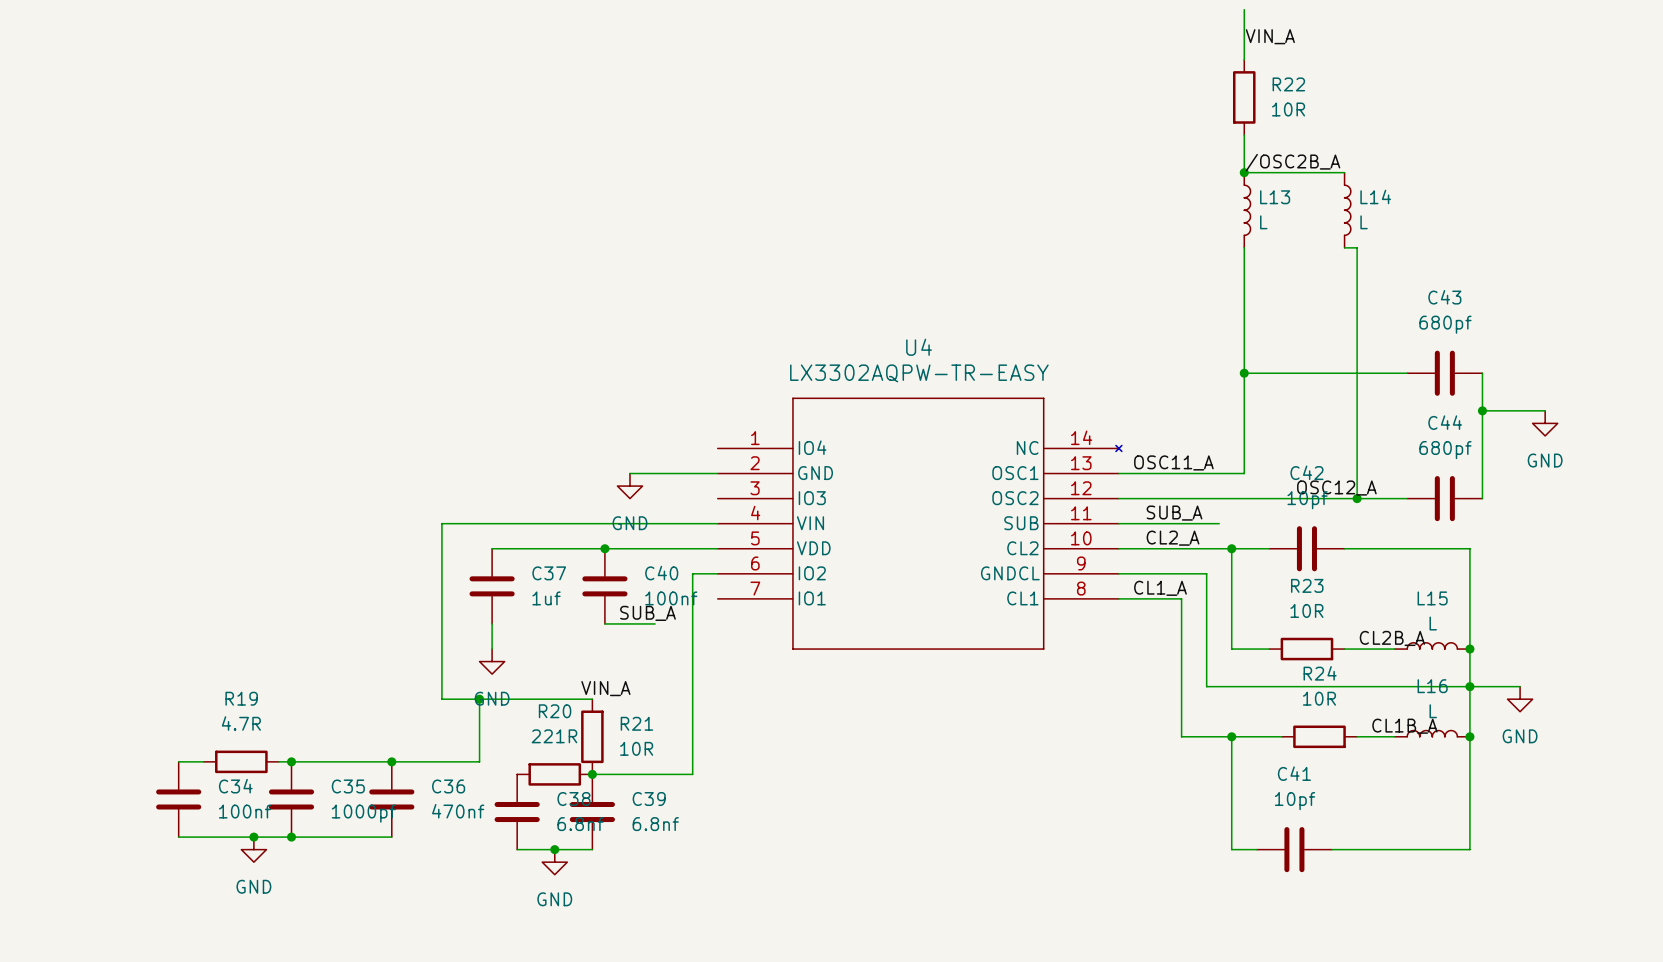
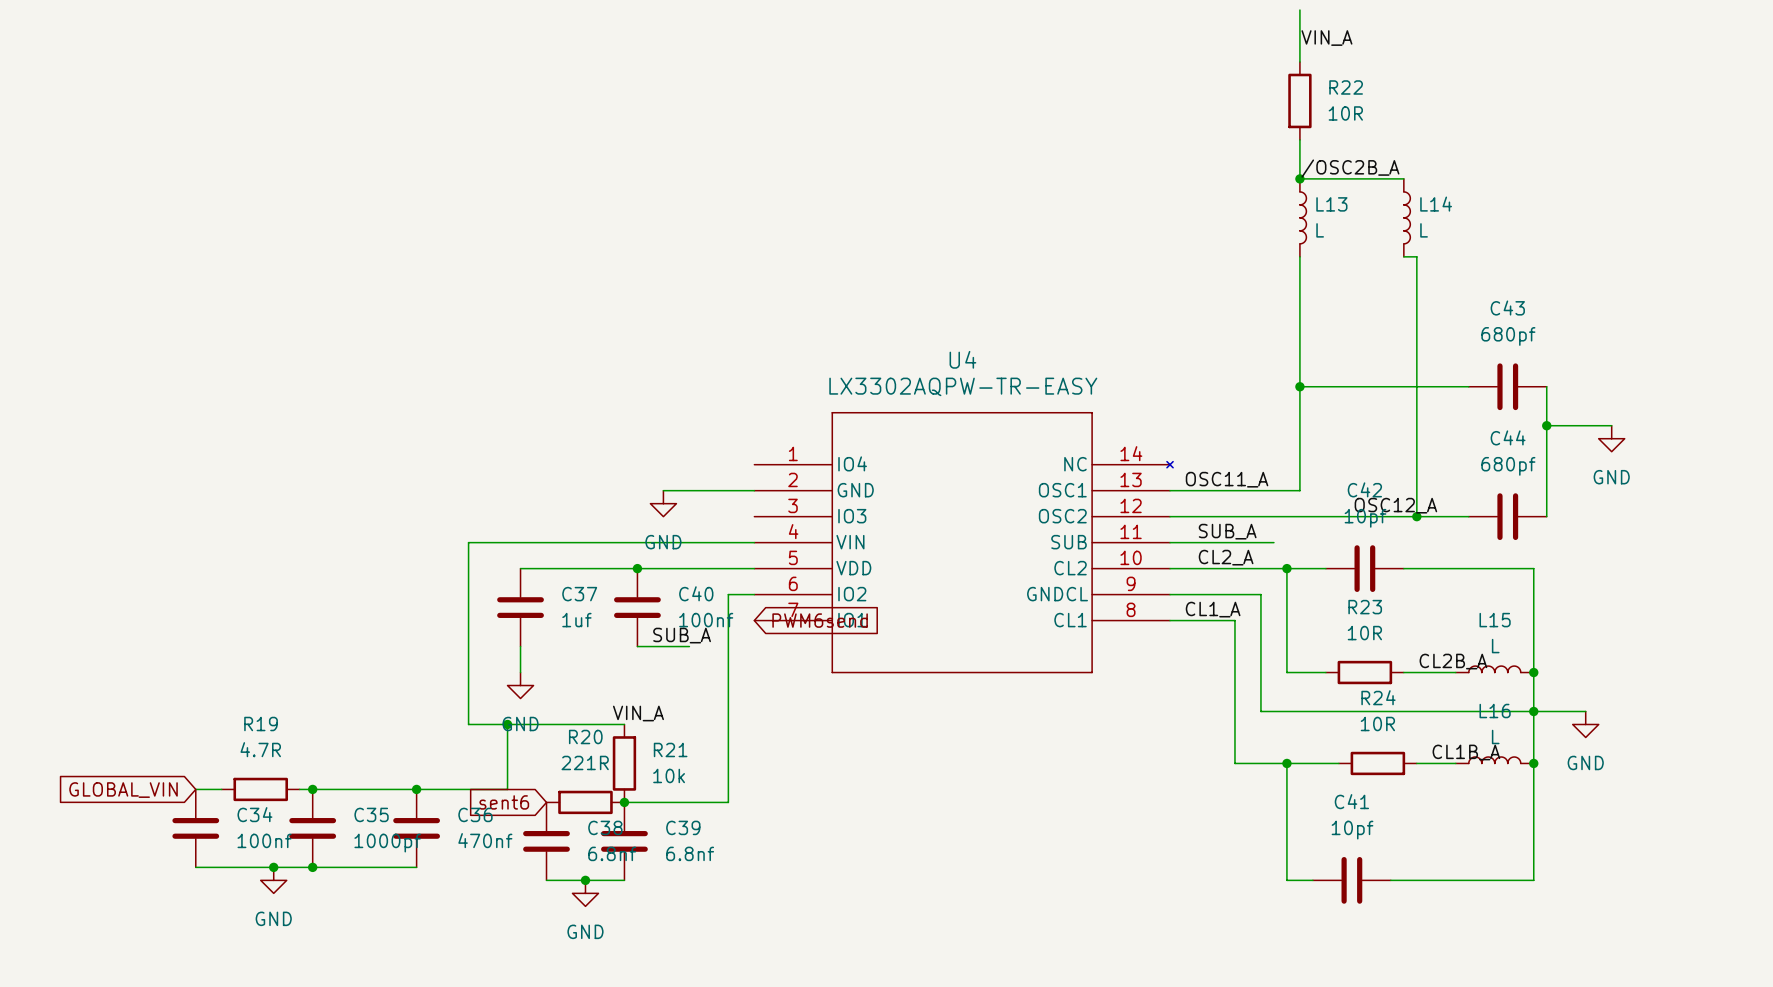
global label: none -> PWM6send (820, 620)
R21 value: 10R (636, 748) -> 10k (669, 775)
global label: none -> GLOBAL_VIN (123, 790)
global label: none -> sent6 (504, 802)

